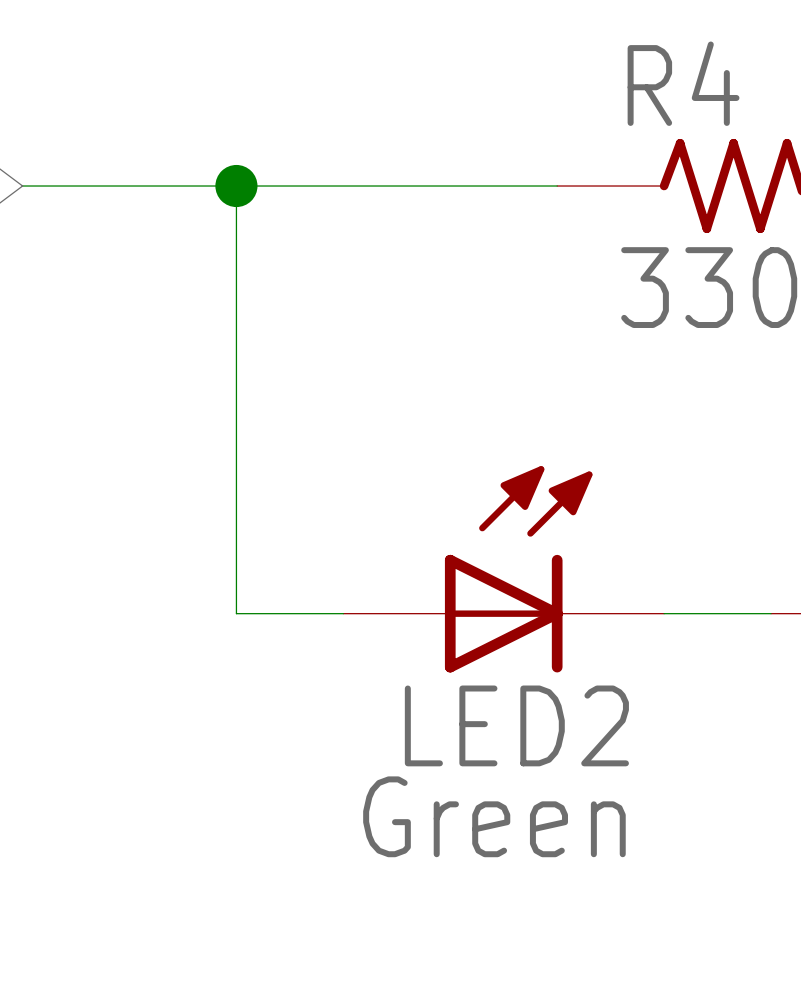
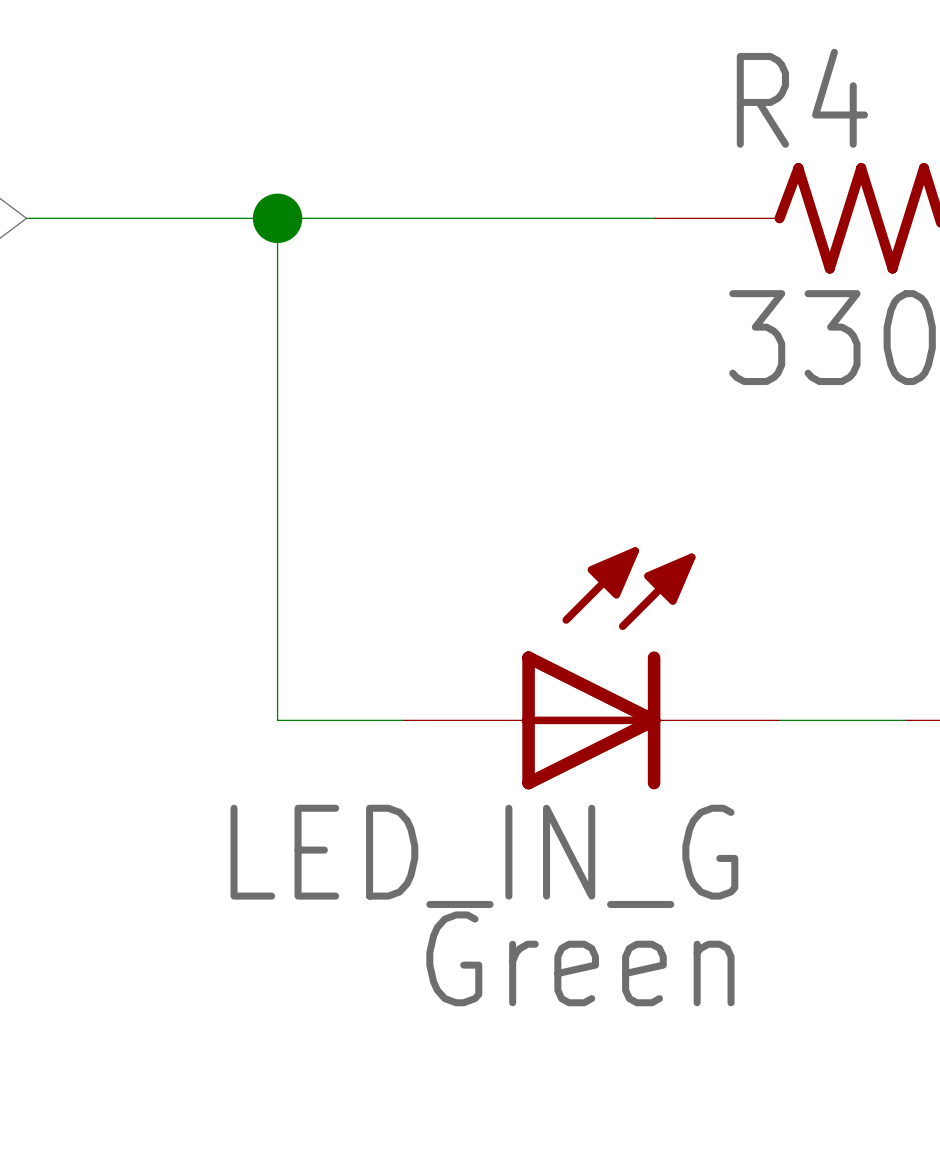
LED2 name: LED2 (516, 725) -> LED_IN_G (484, 856)

